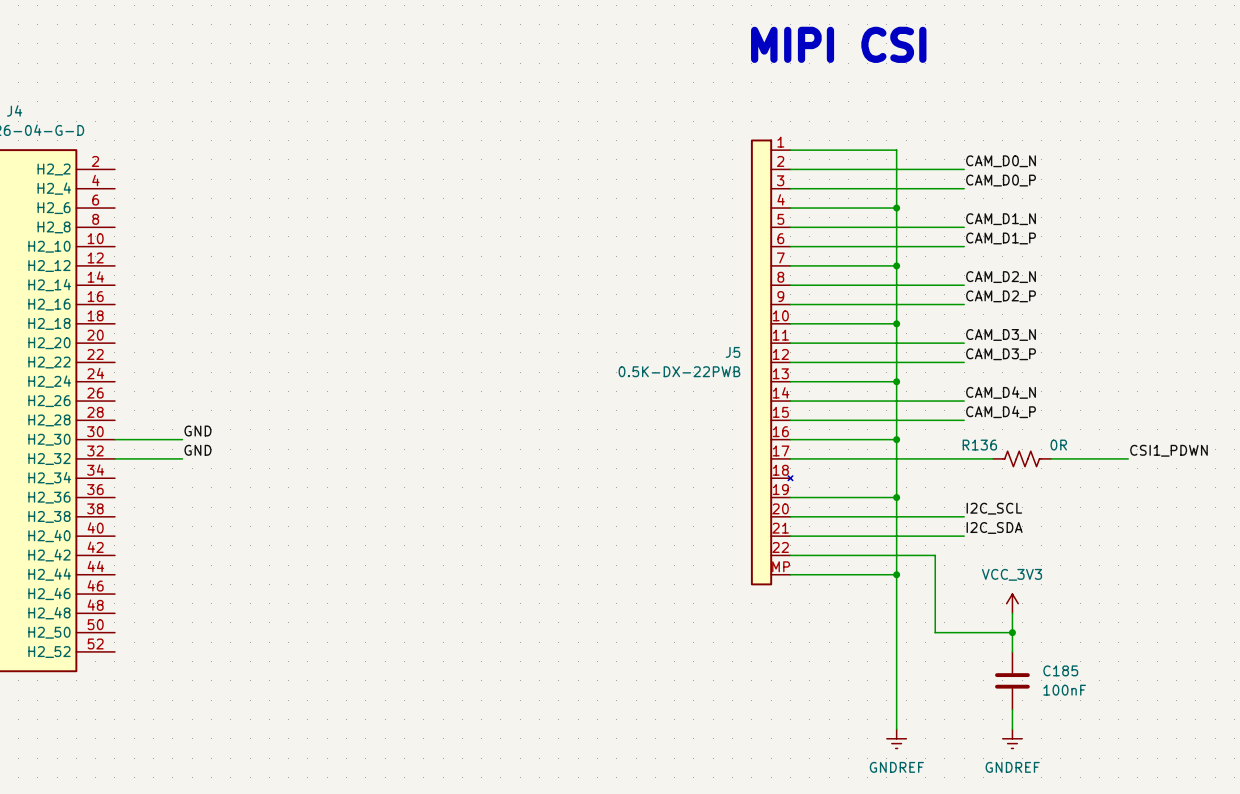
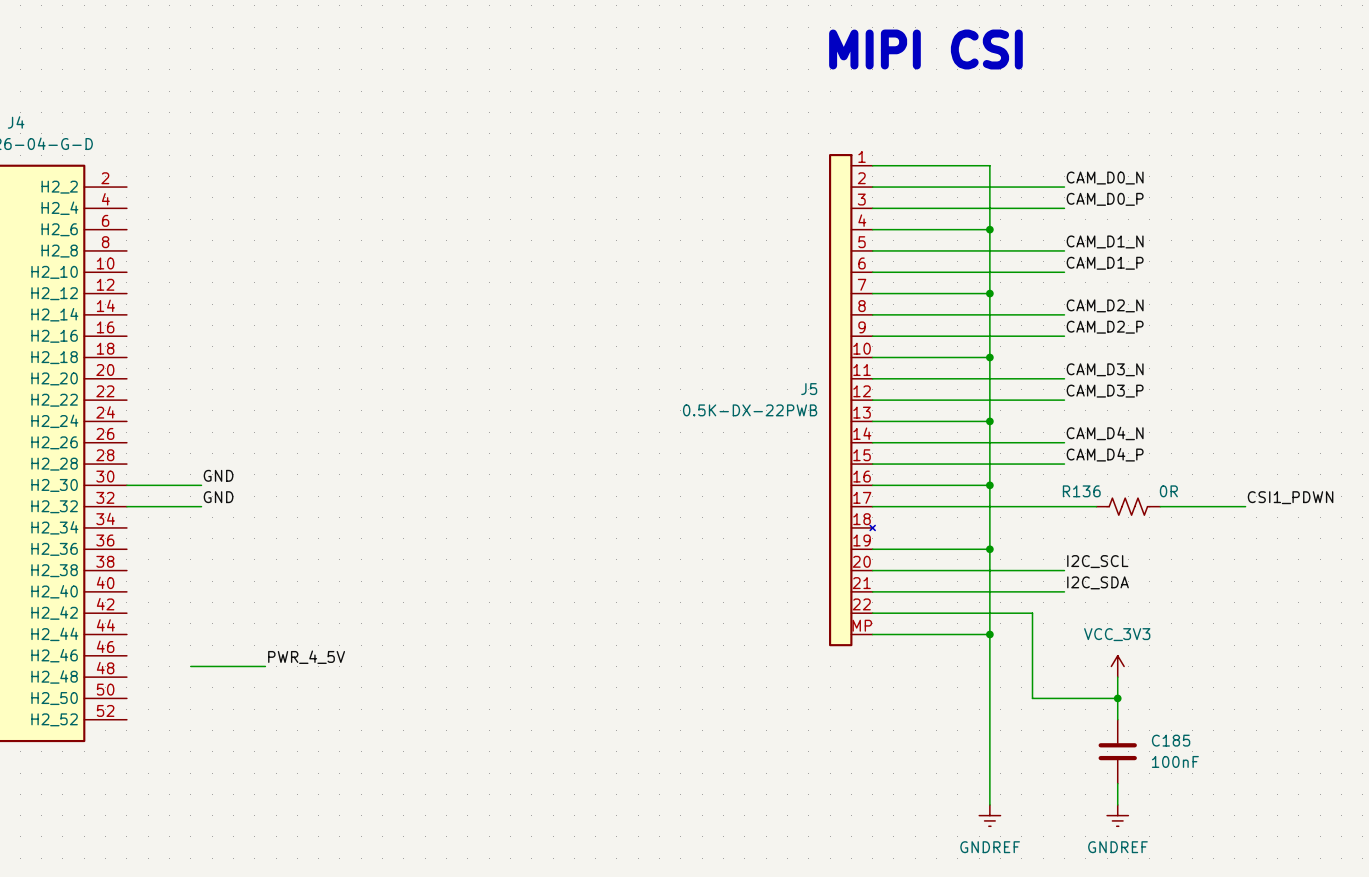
label: none -> PWR_4_5V (306, 657)
wire: none -> (190, 666) (265, 666)

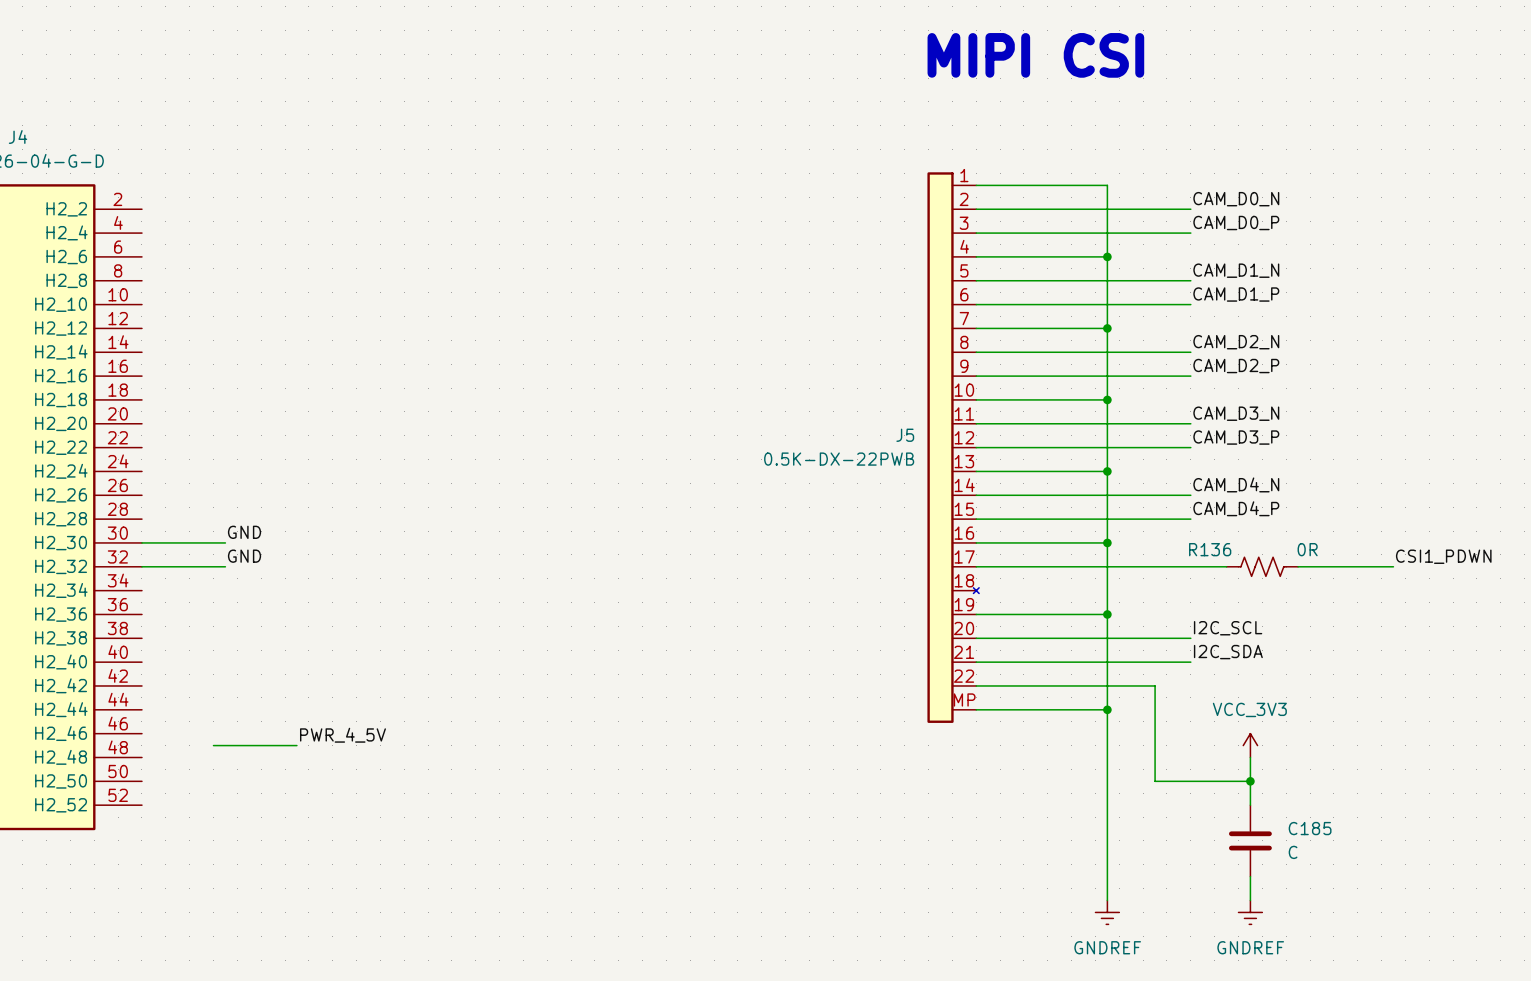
C185 value: 100nF (1175, 761) -> C (1293, 852)

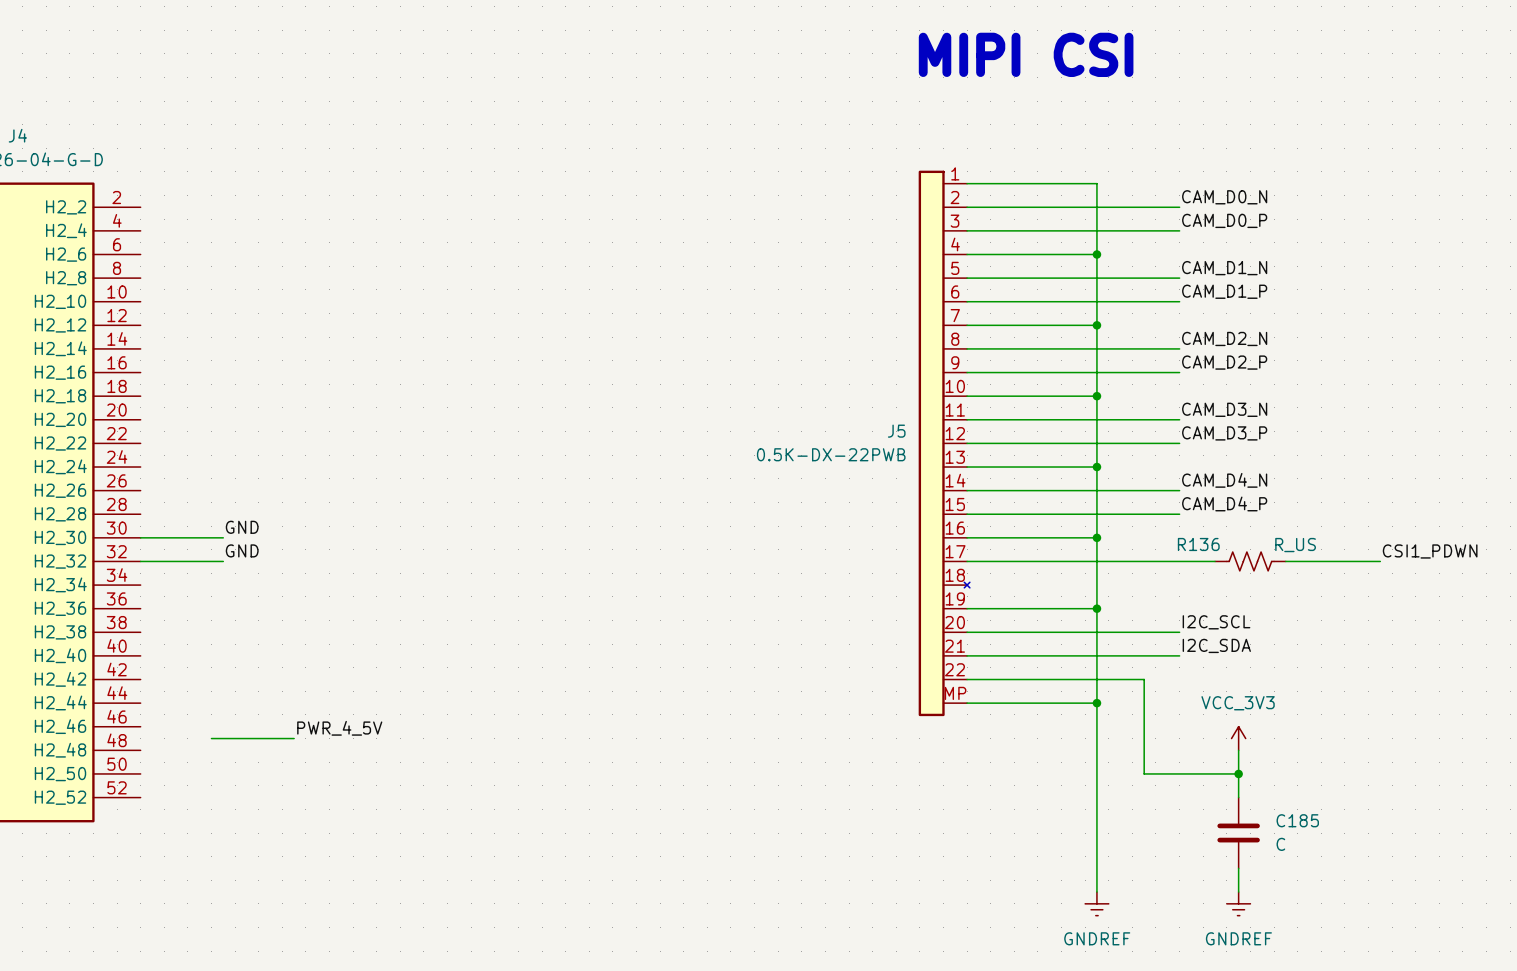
R136 value: 0R (1307, 549) -> R_US (1295, 545)

